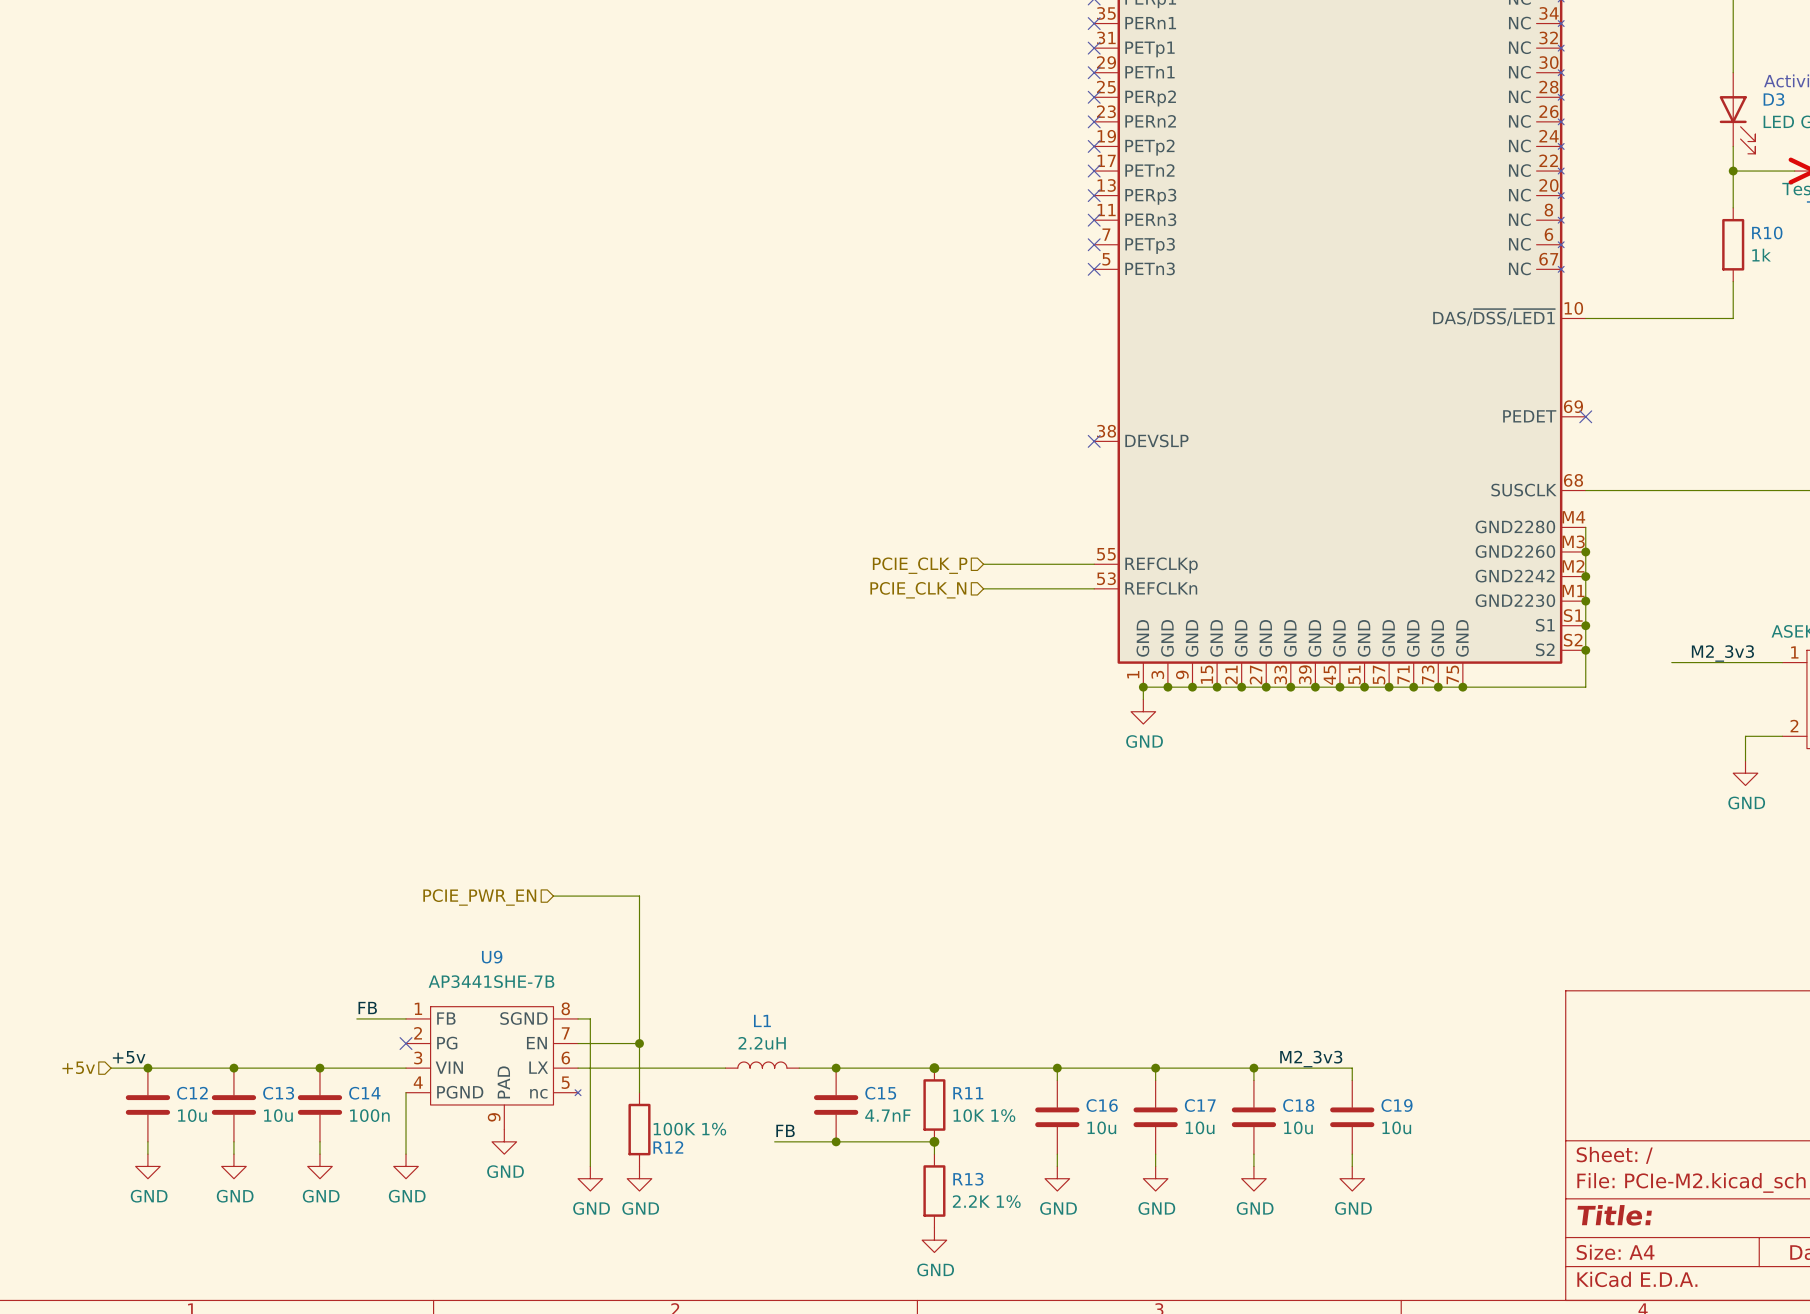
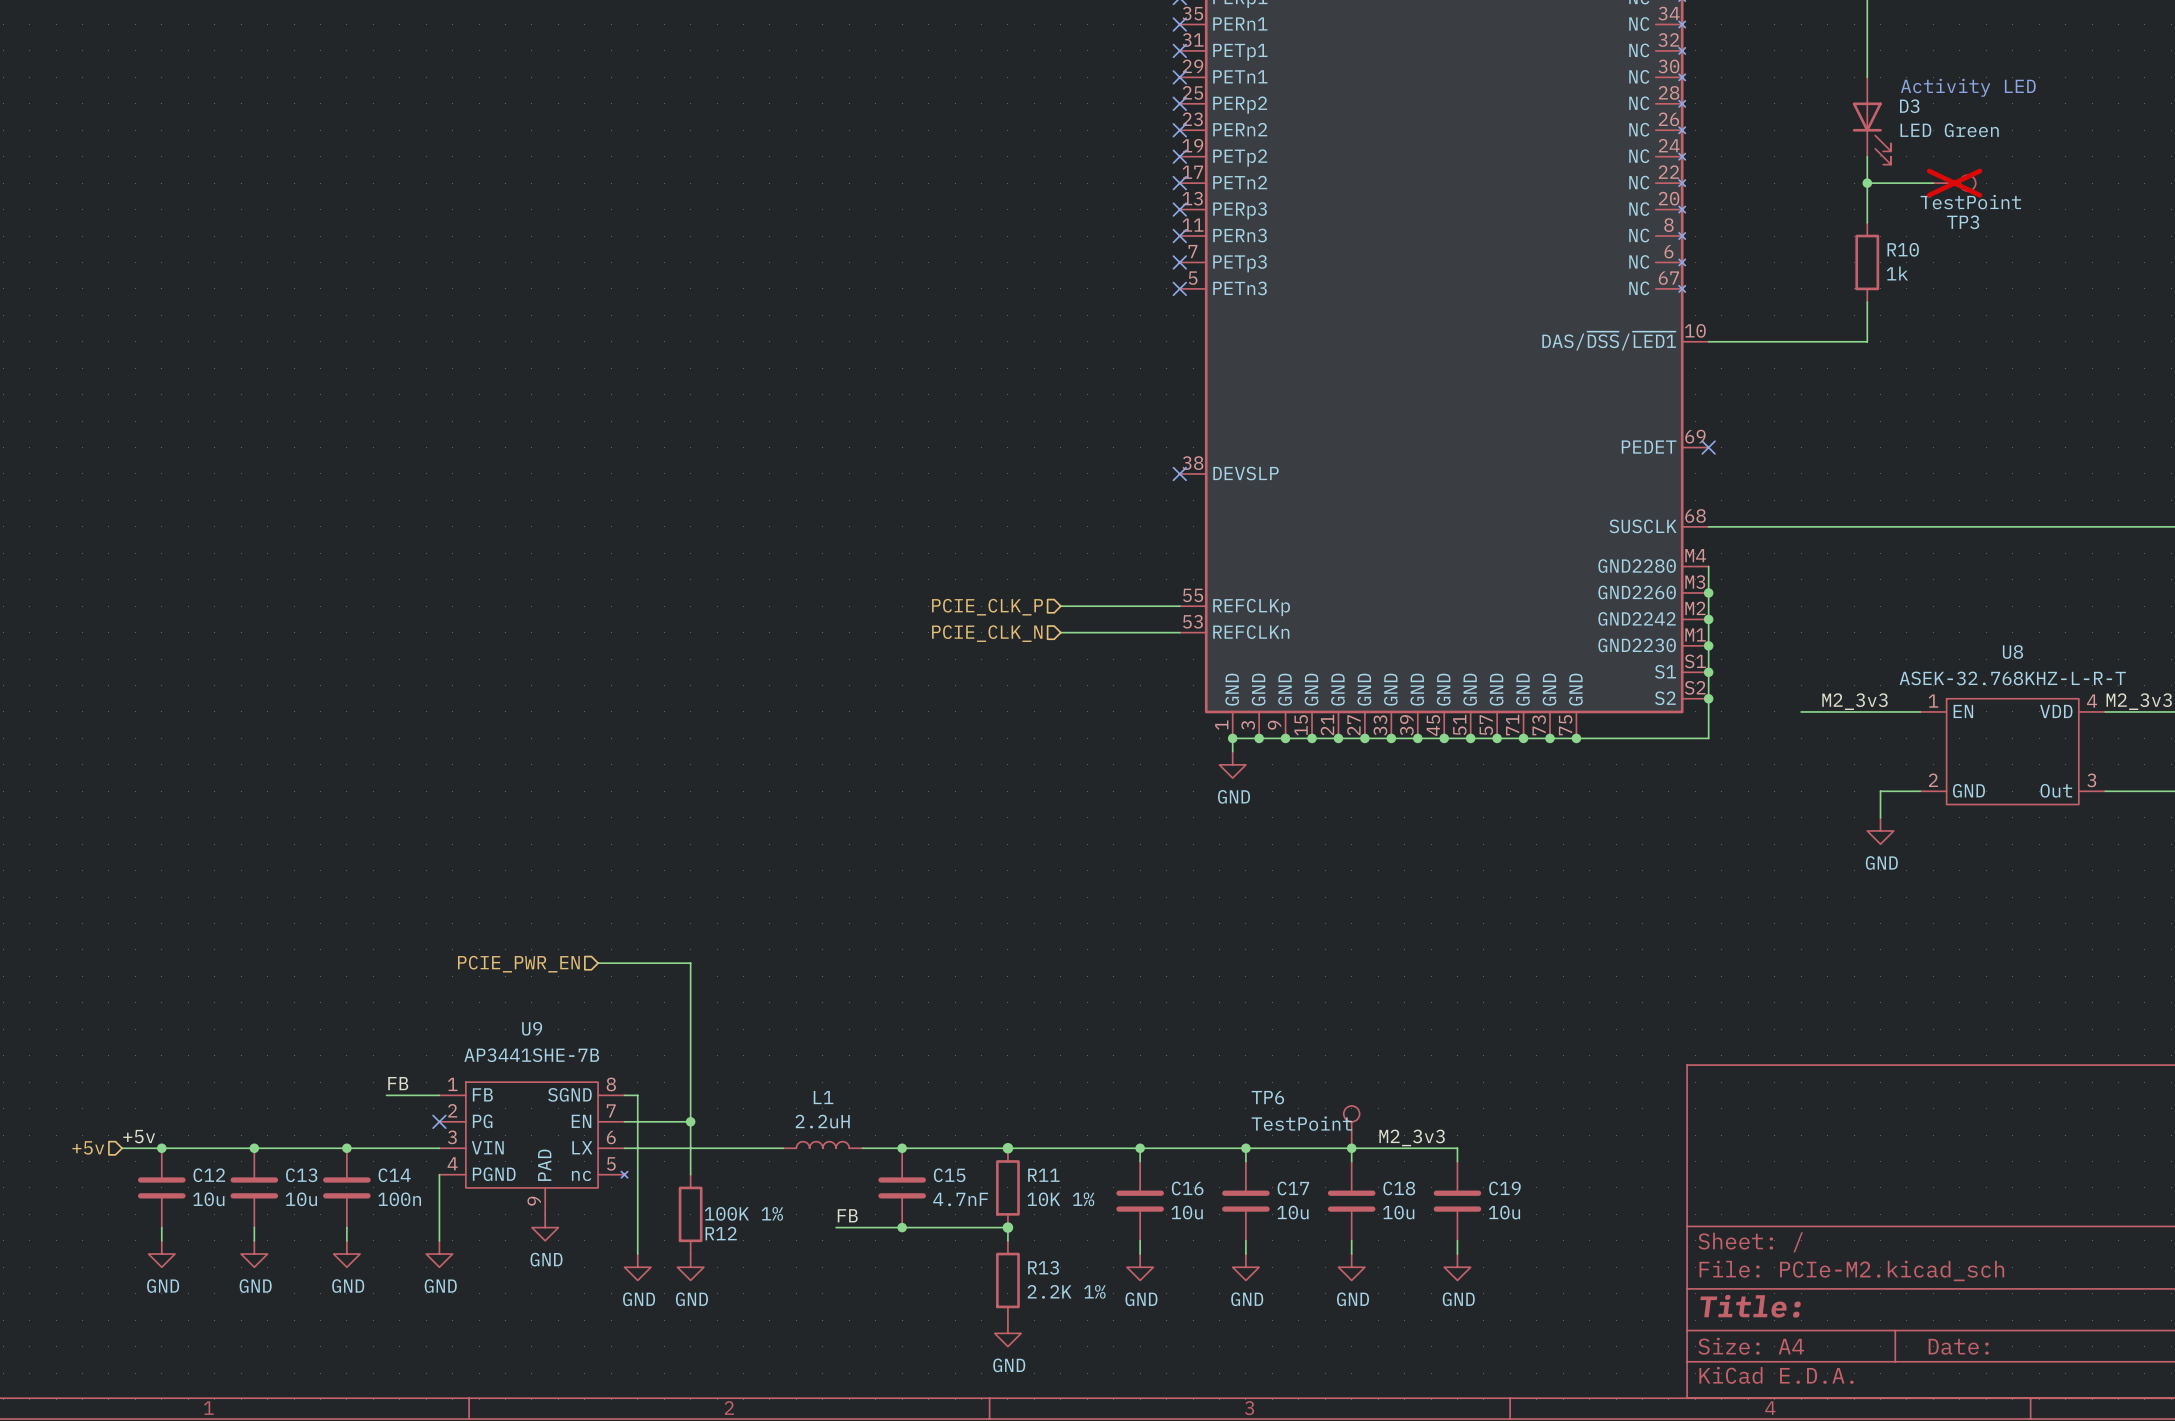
TP6: none -> TestPoint (1351, 1127)

